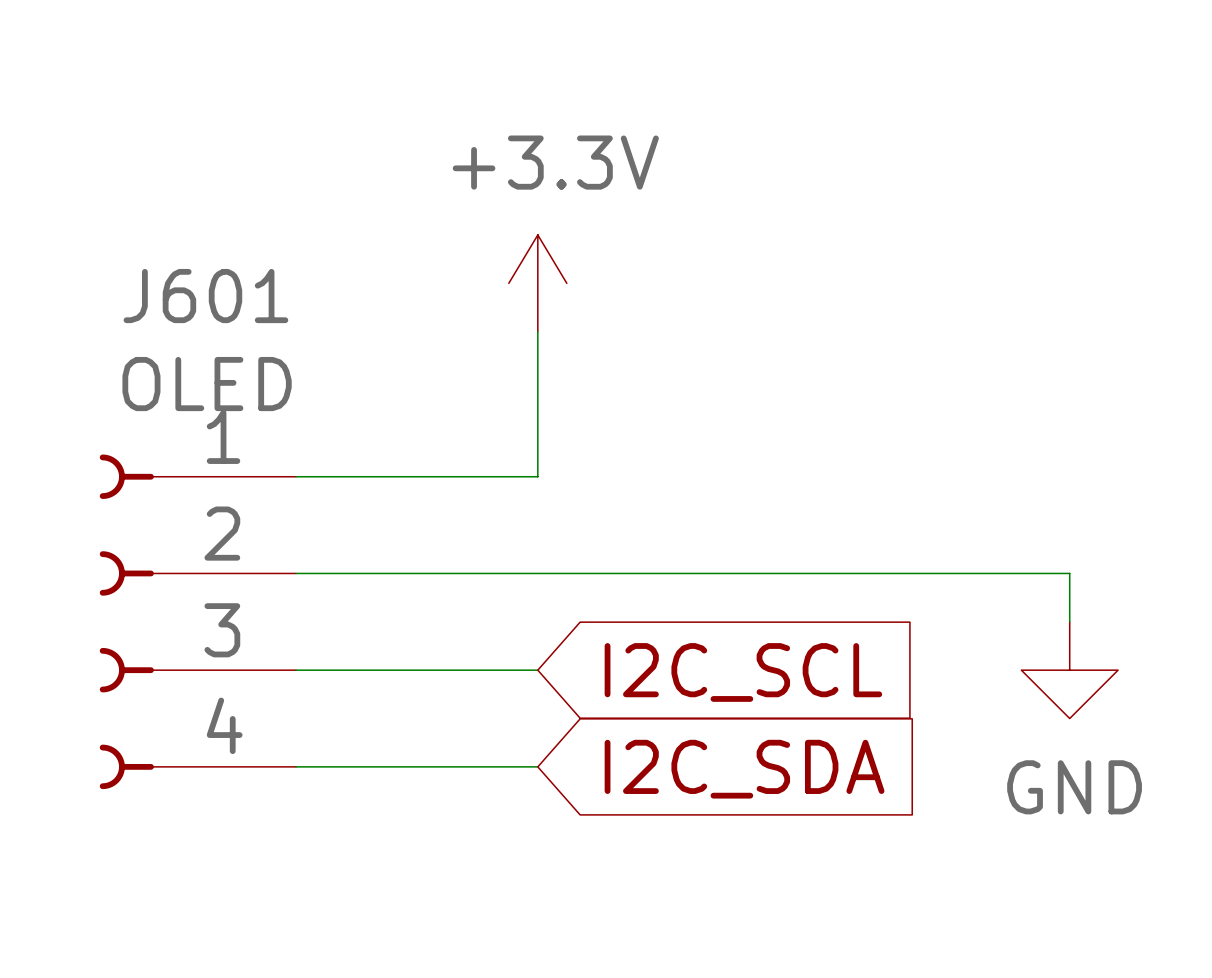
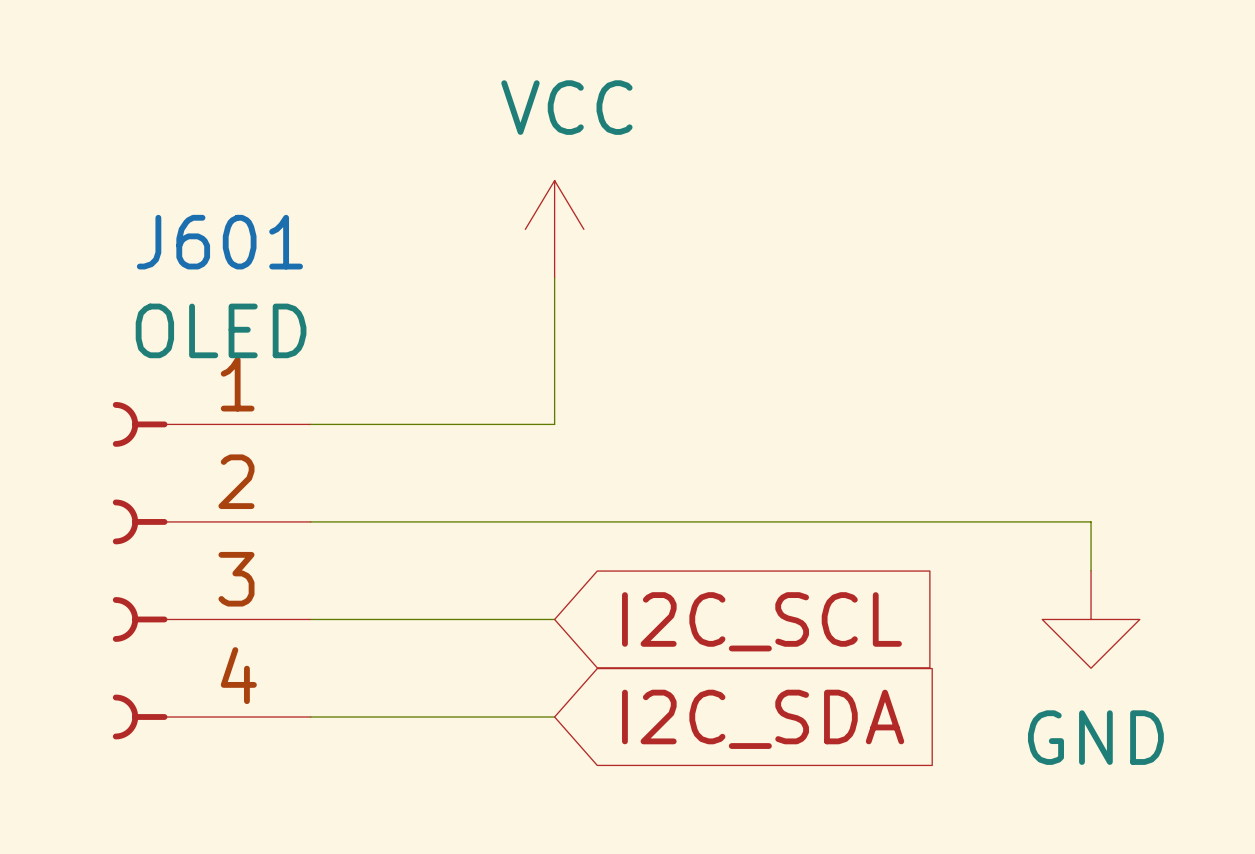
power symbol: +3.3V (537, 283) -> VCC (554, 229)

